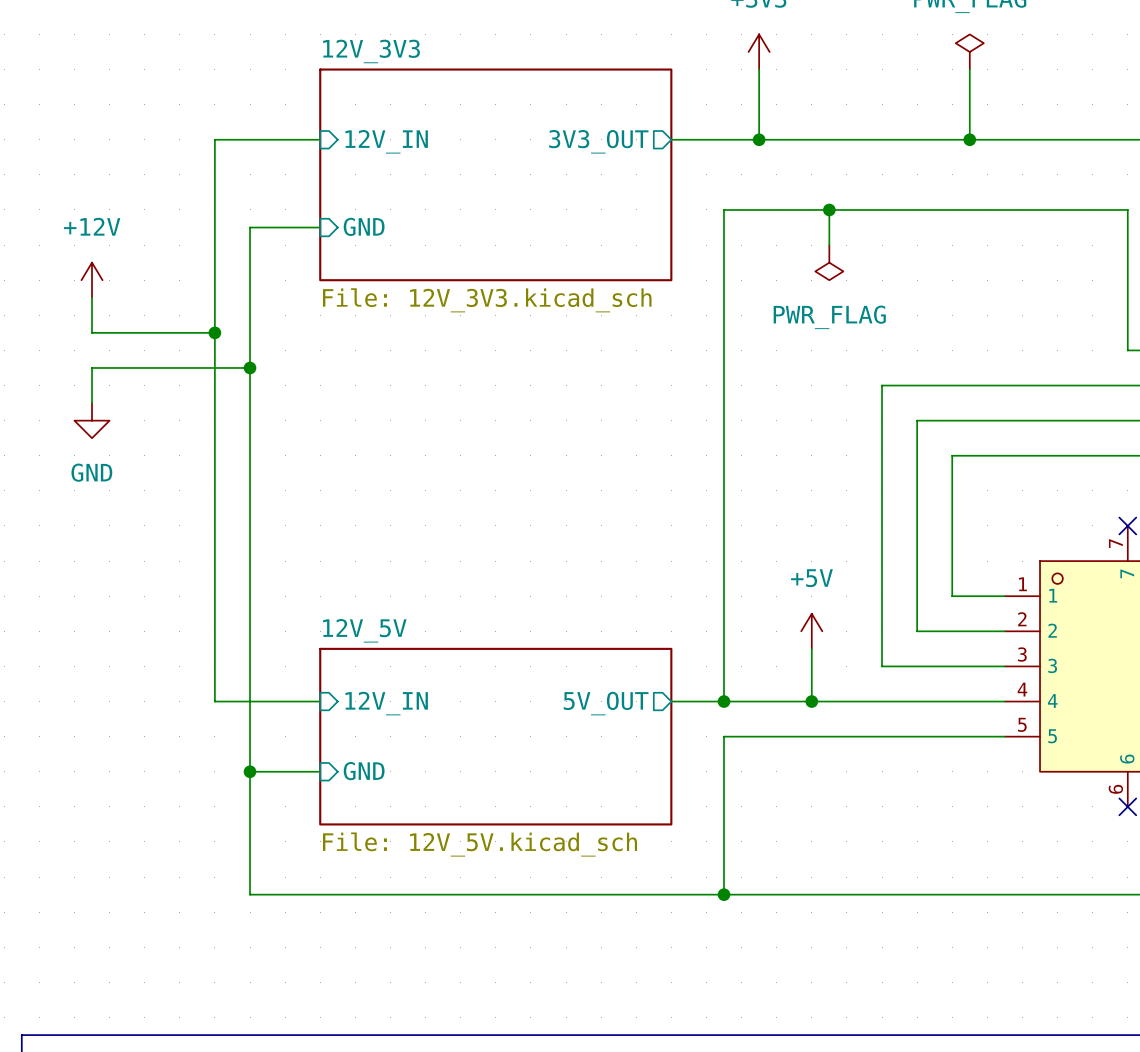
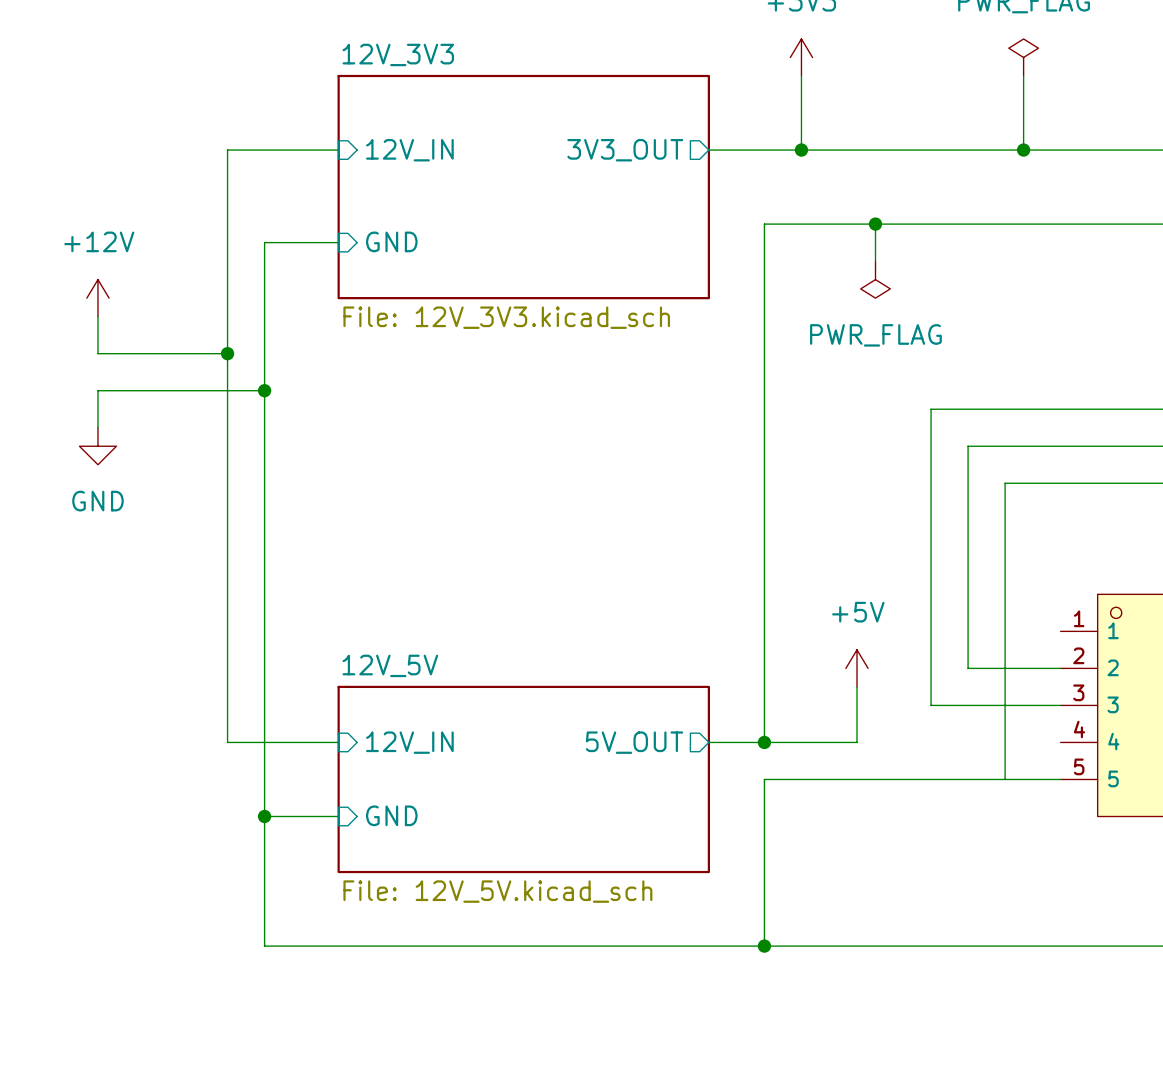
wire: (952, 596) (1004, 596) -> (1005, 631) (1005, 779)
wire: (811, 701) (1004, 701) -> none
junction: (811, 701) -> none

